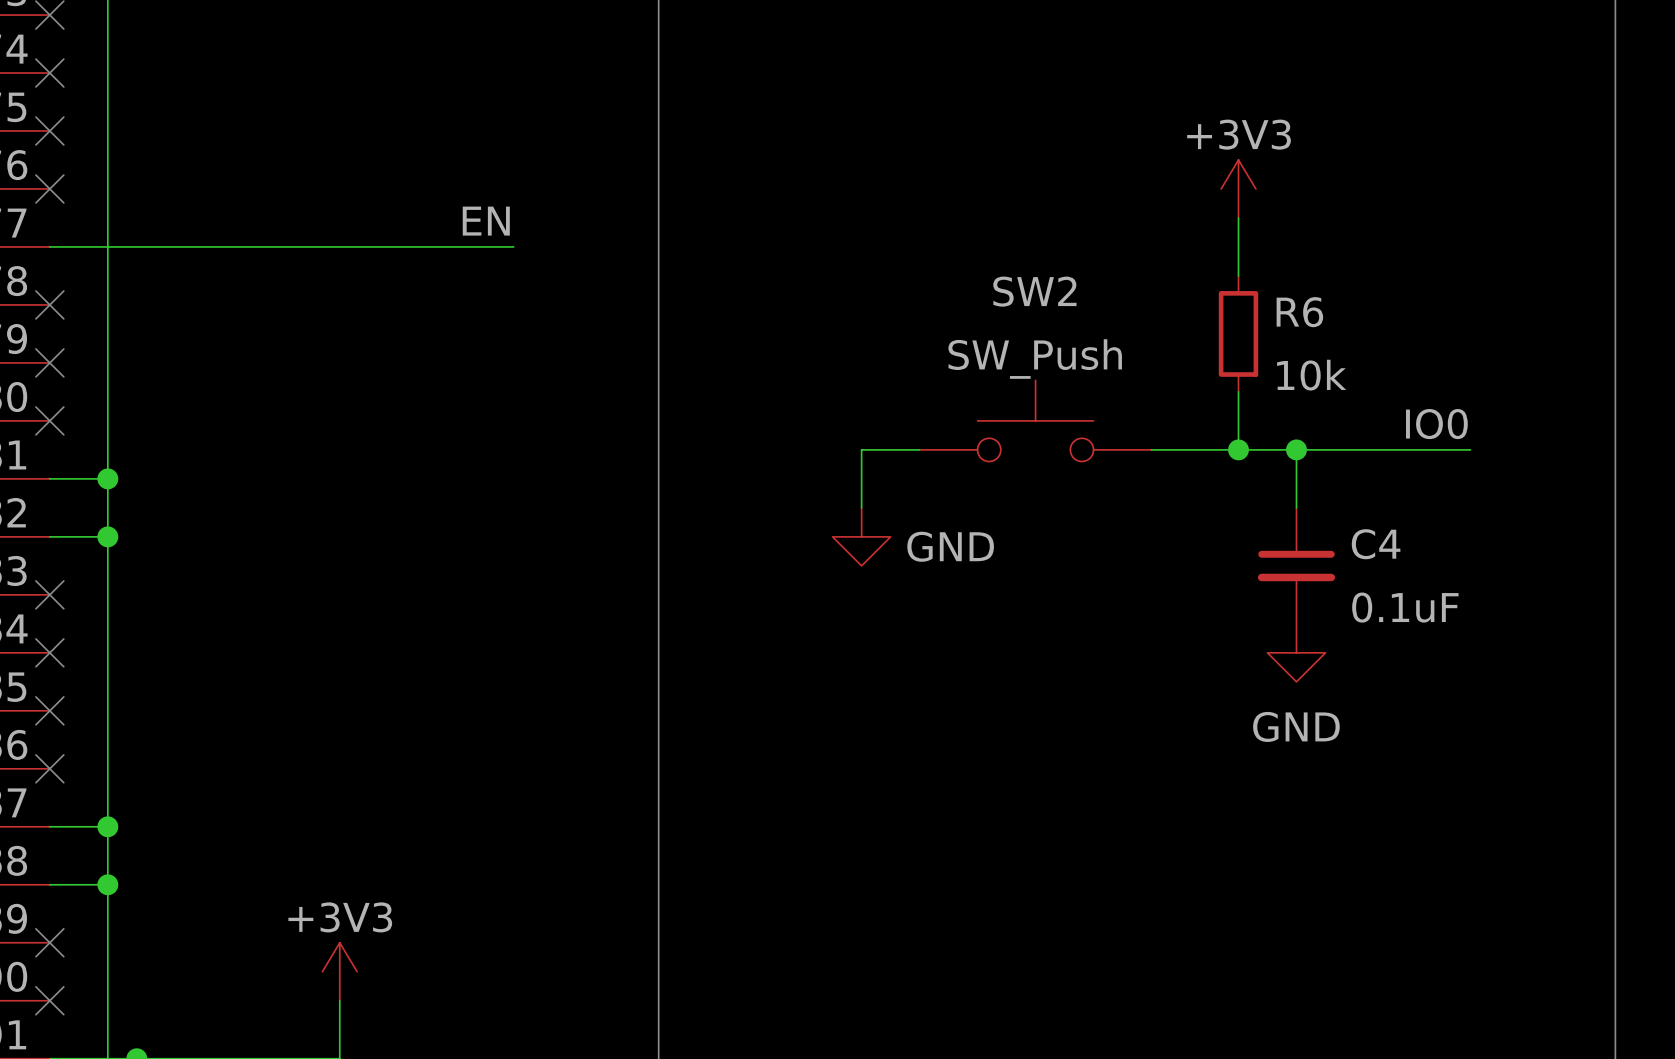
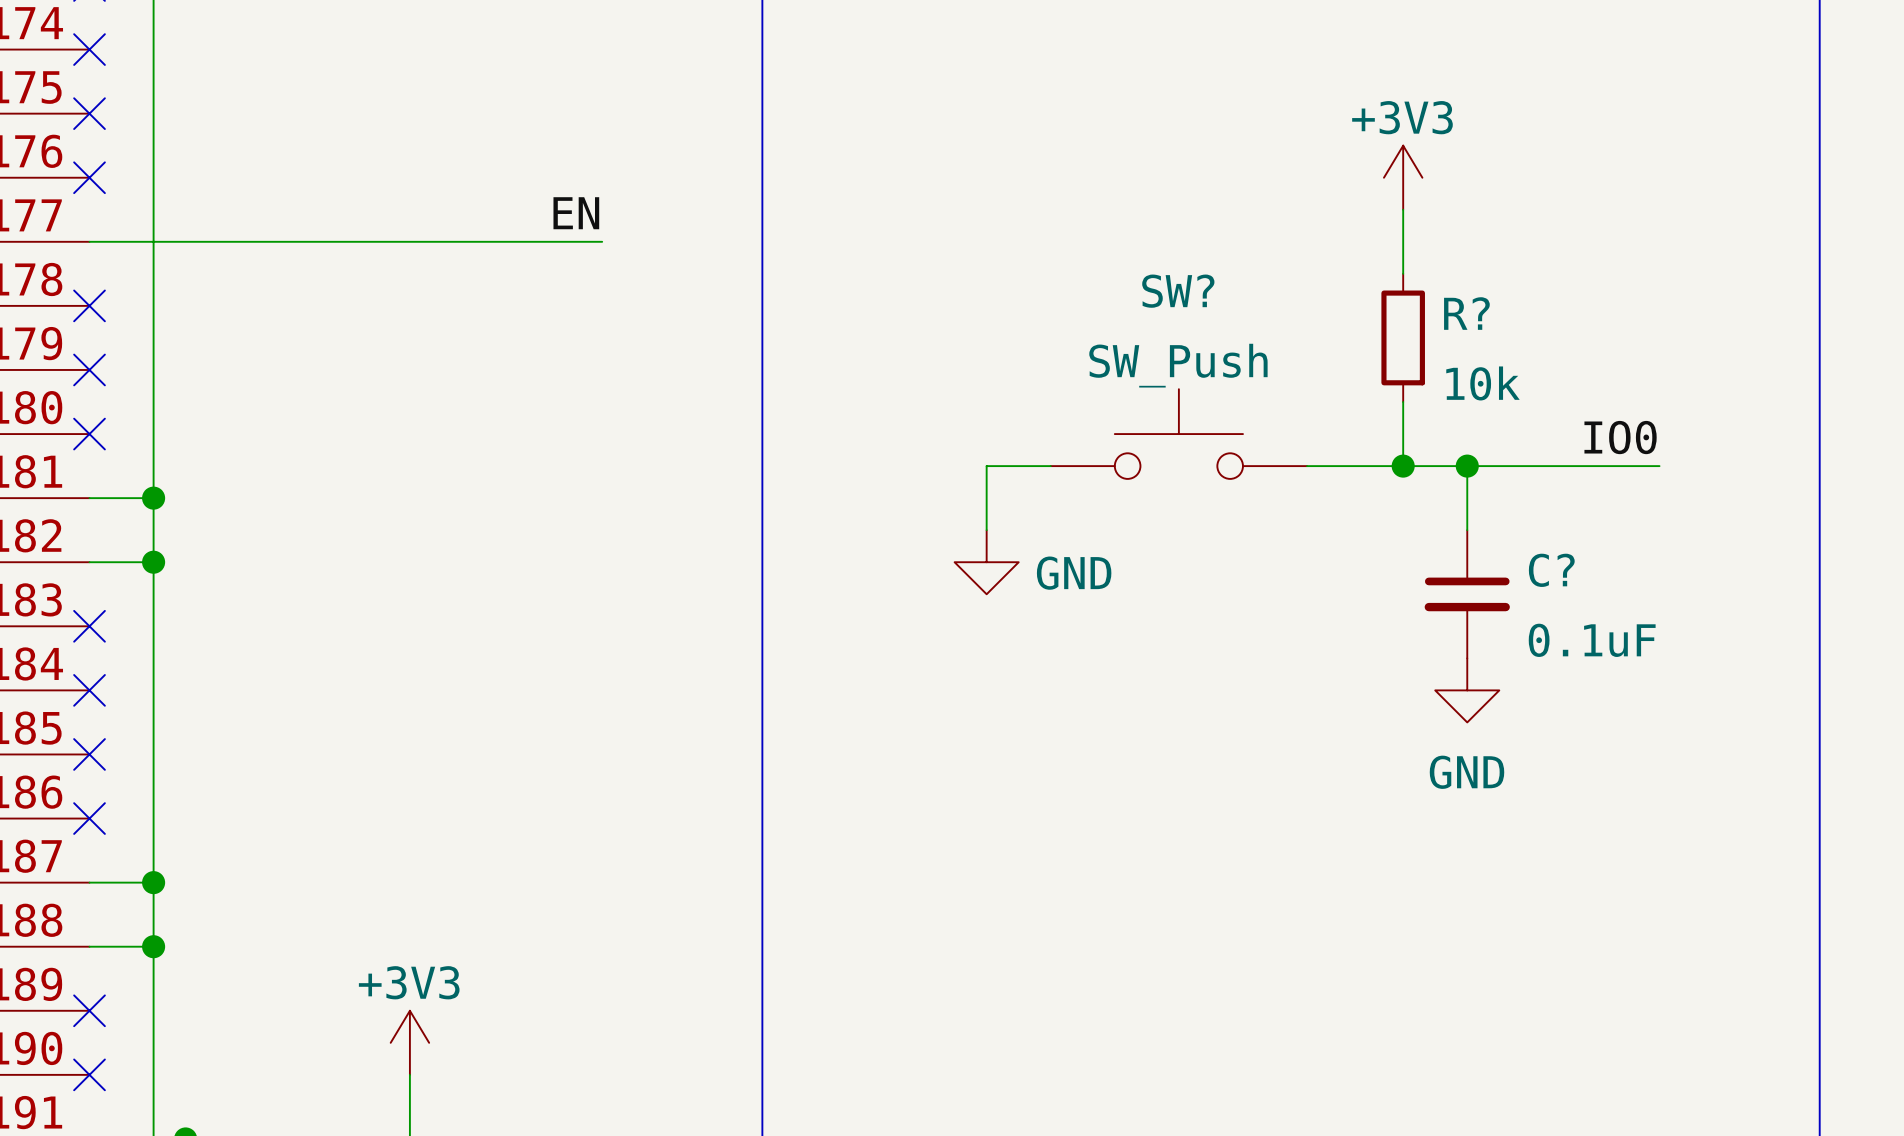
SW2 name: SW2 (1034, 291) -> SW? (1178, 291)
R6 name: R6 (1299, 312) -> R? (1466, 313)
C4 name: C4 (1376, 544) -> C? (1551, 570)

